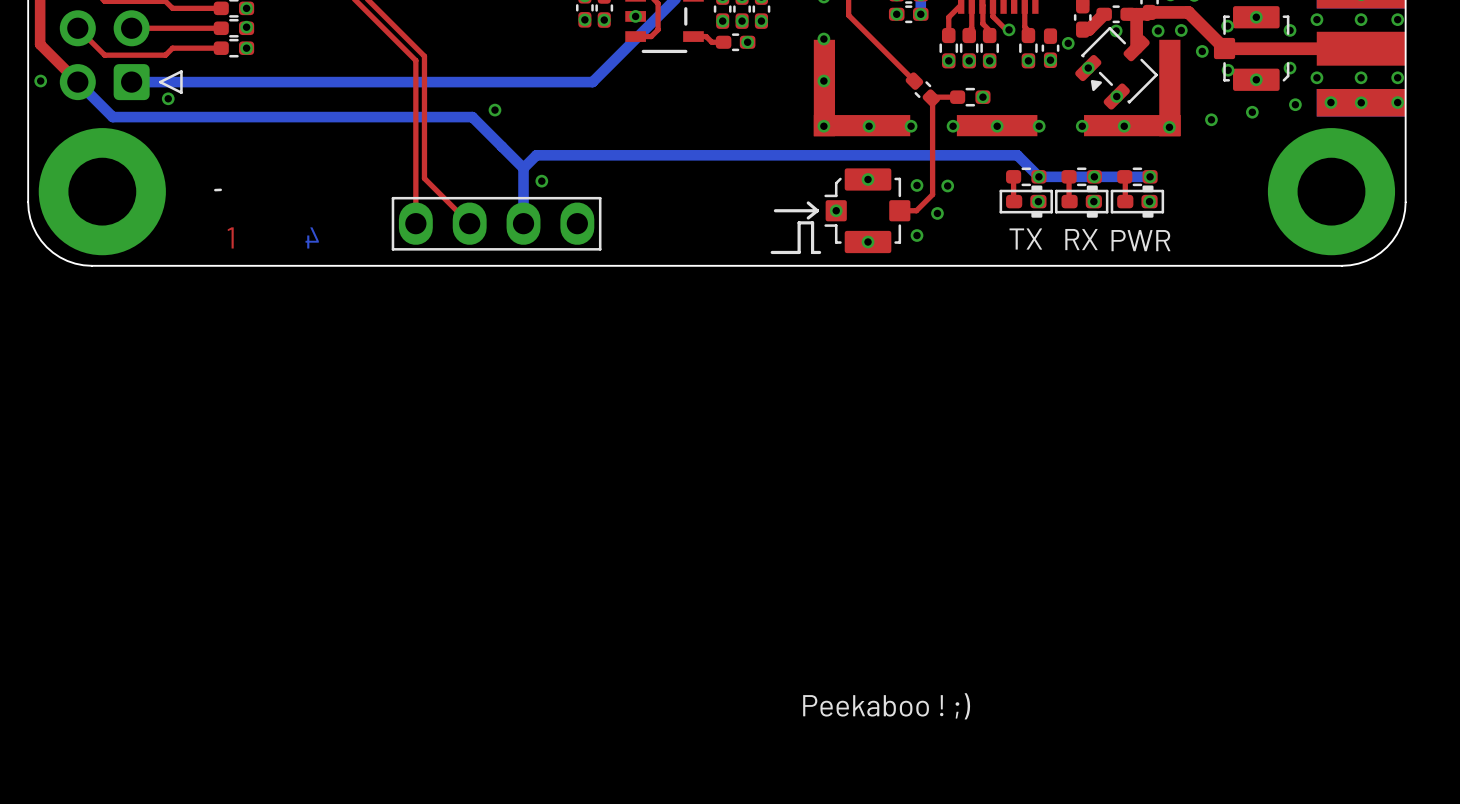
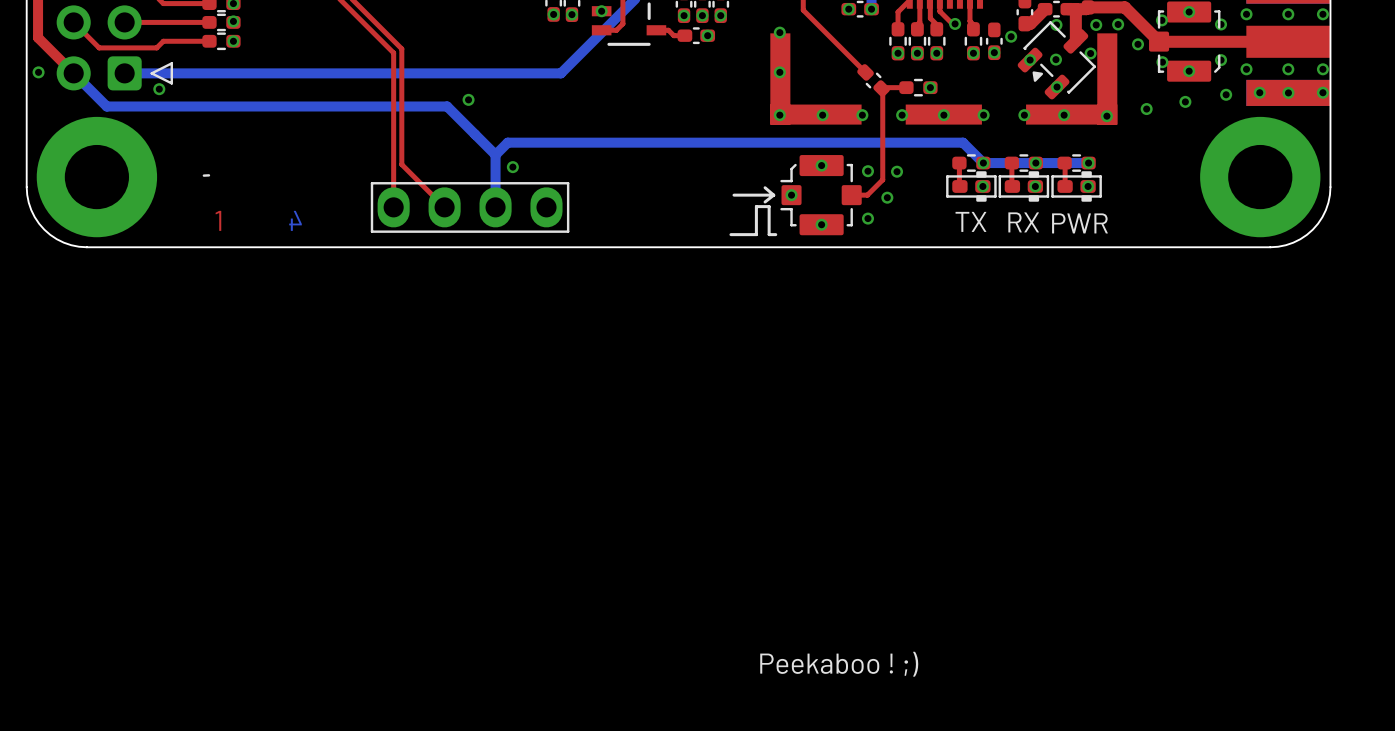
via: none -> (1090, 53)
via: none -> (1055, 59)

